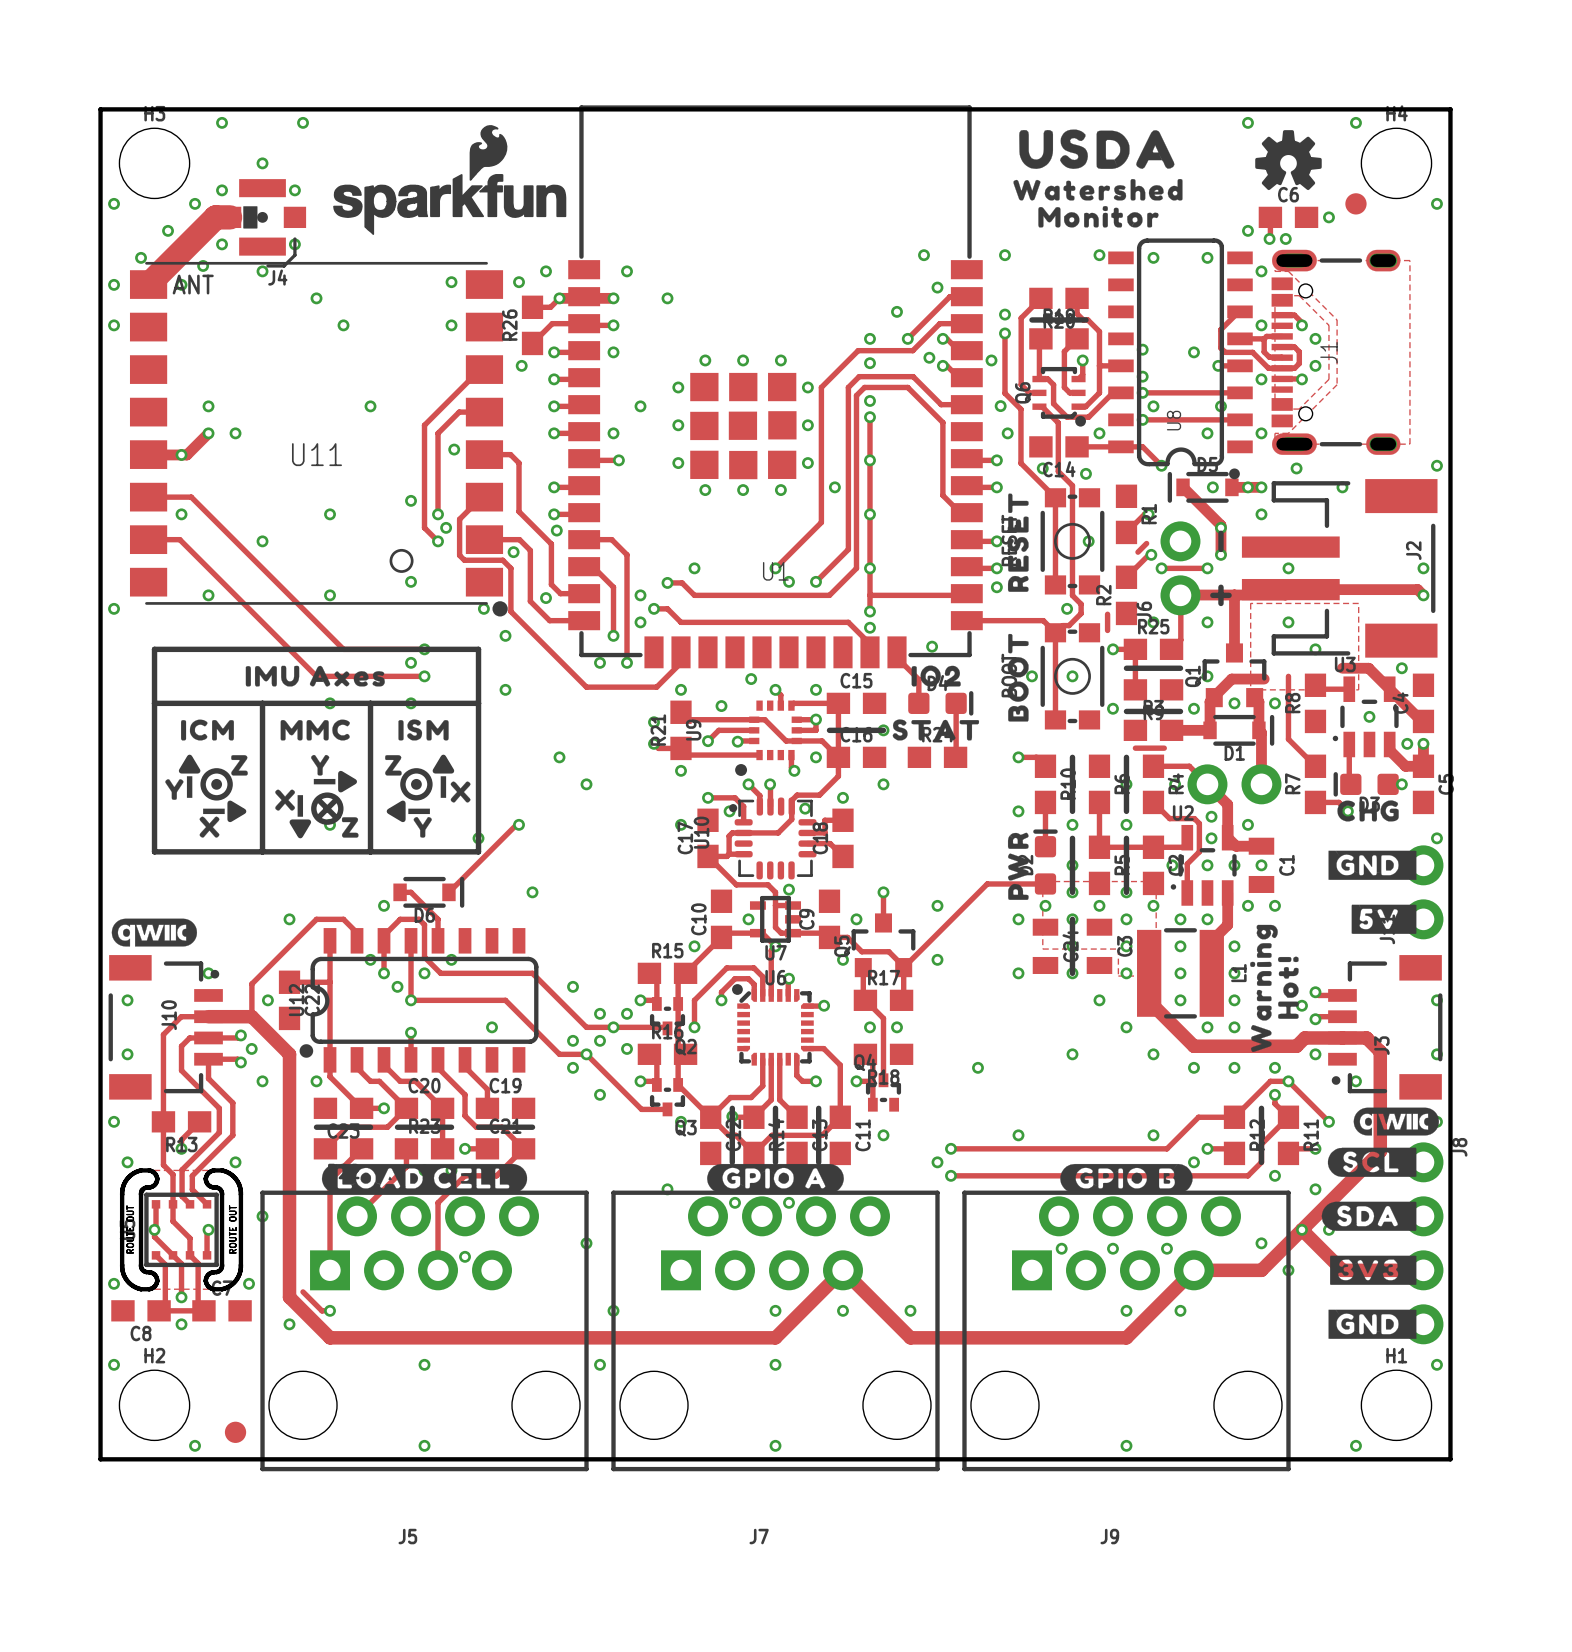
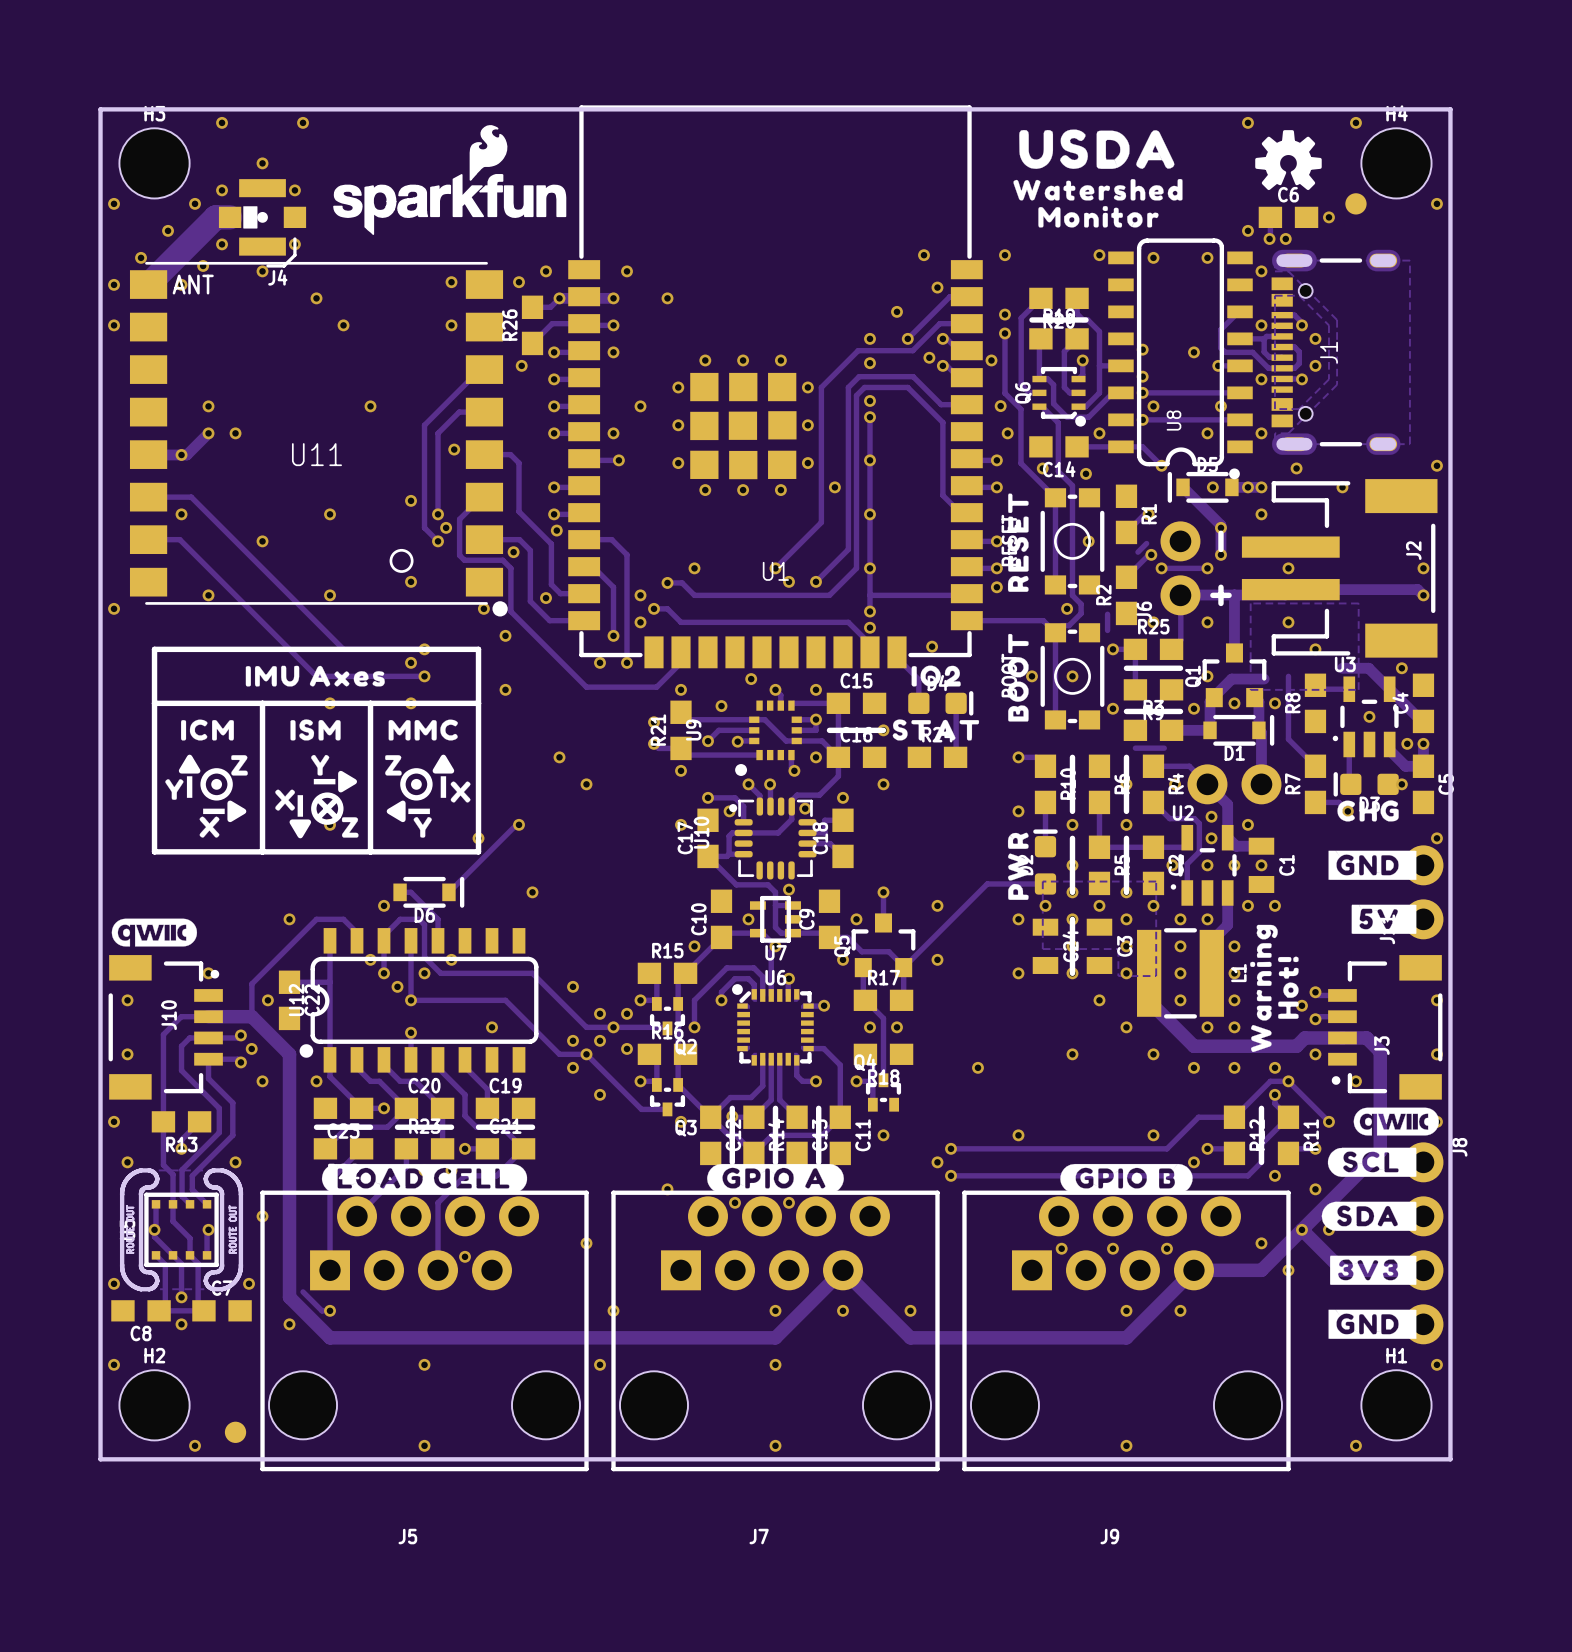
drawing position: (423, 729) -> (315, 729)
drawing position: (315, 730) -> (423, 730)

